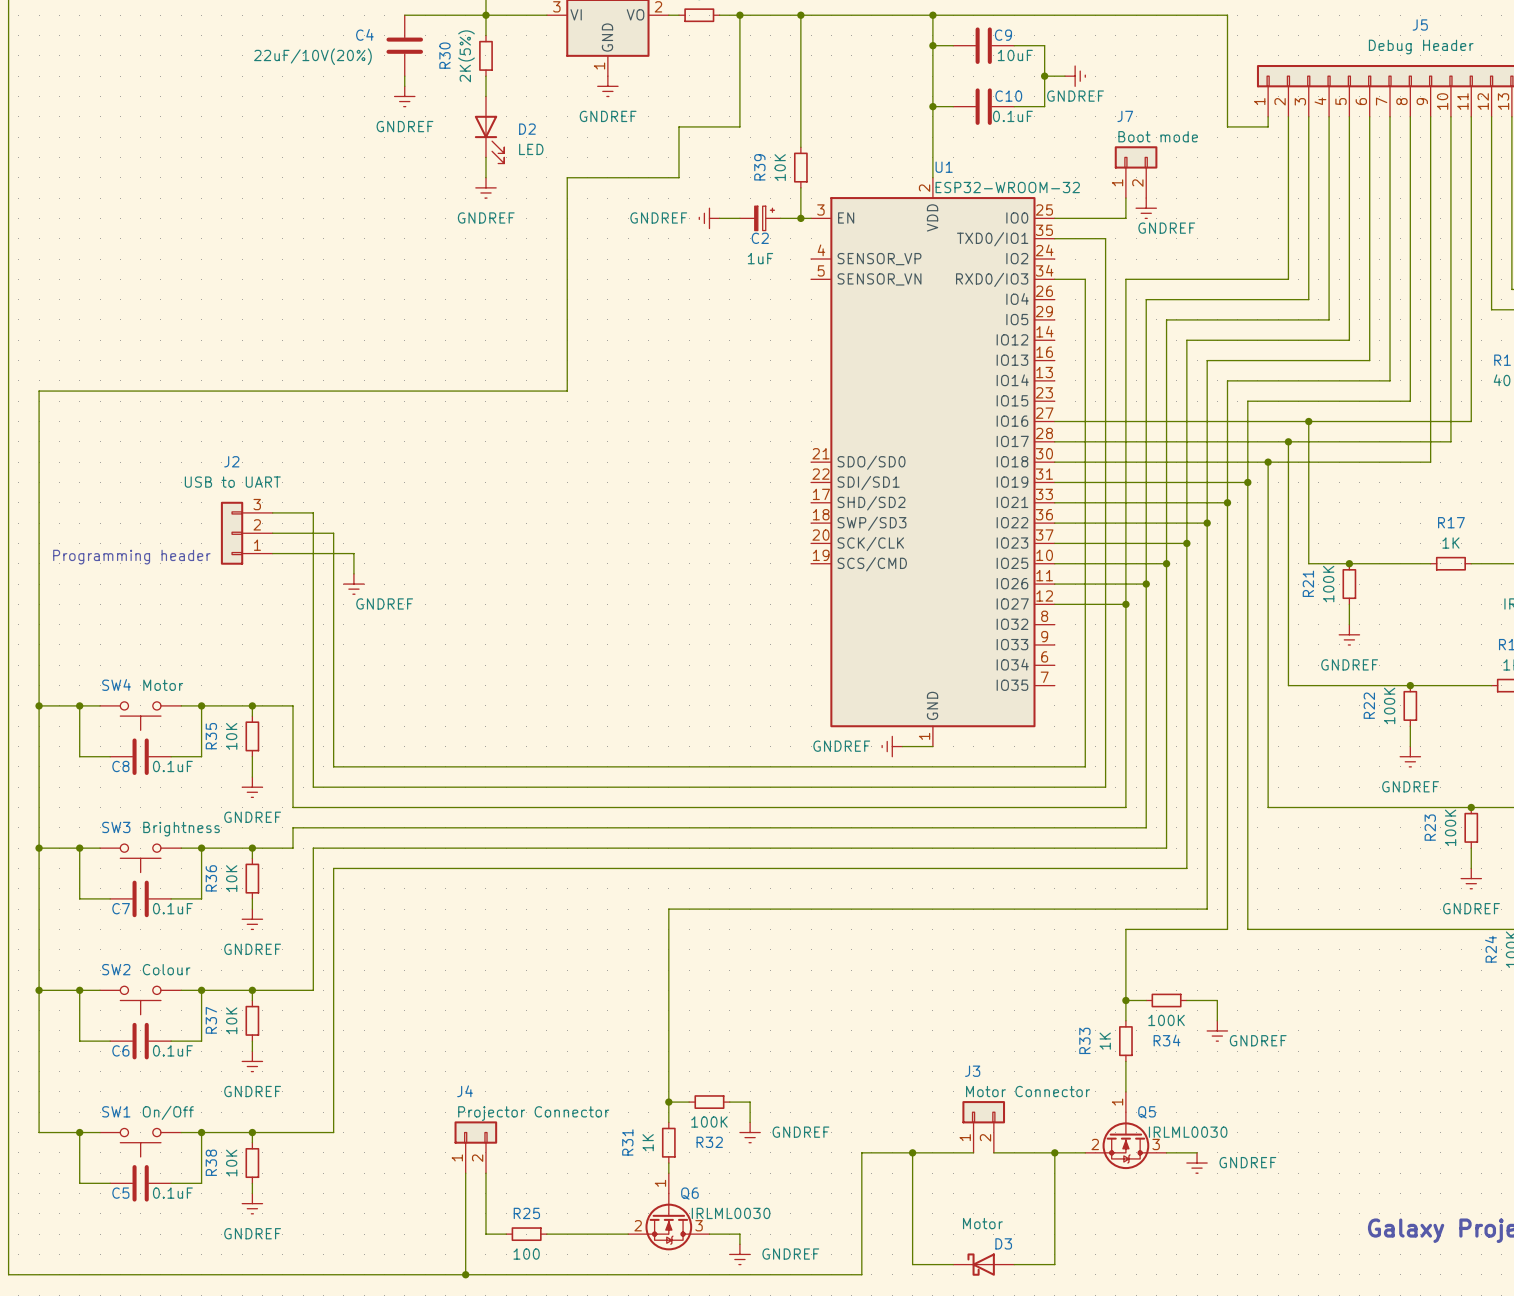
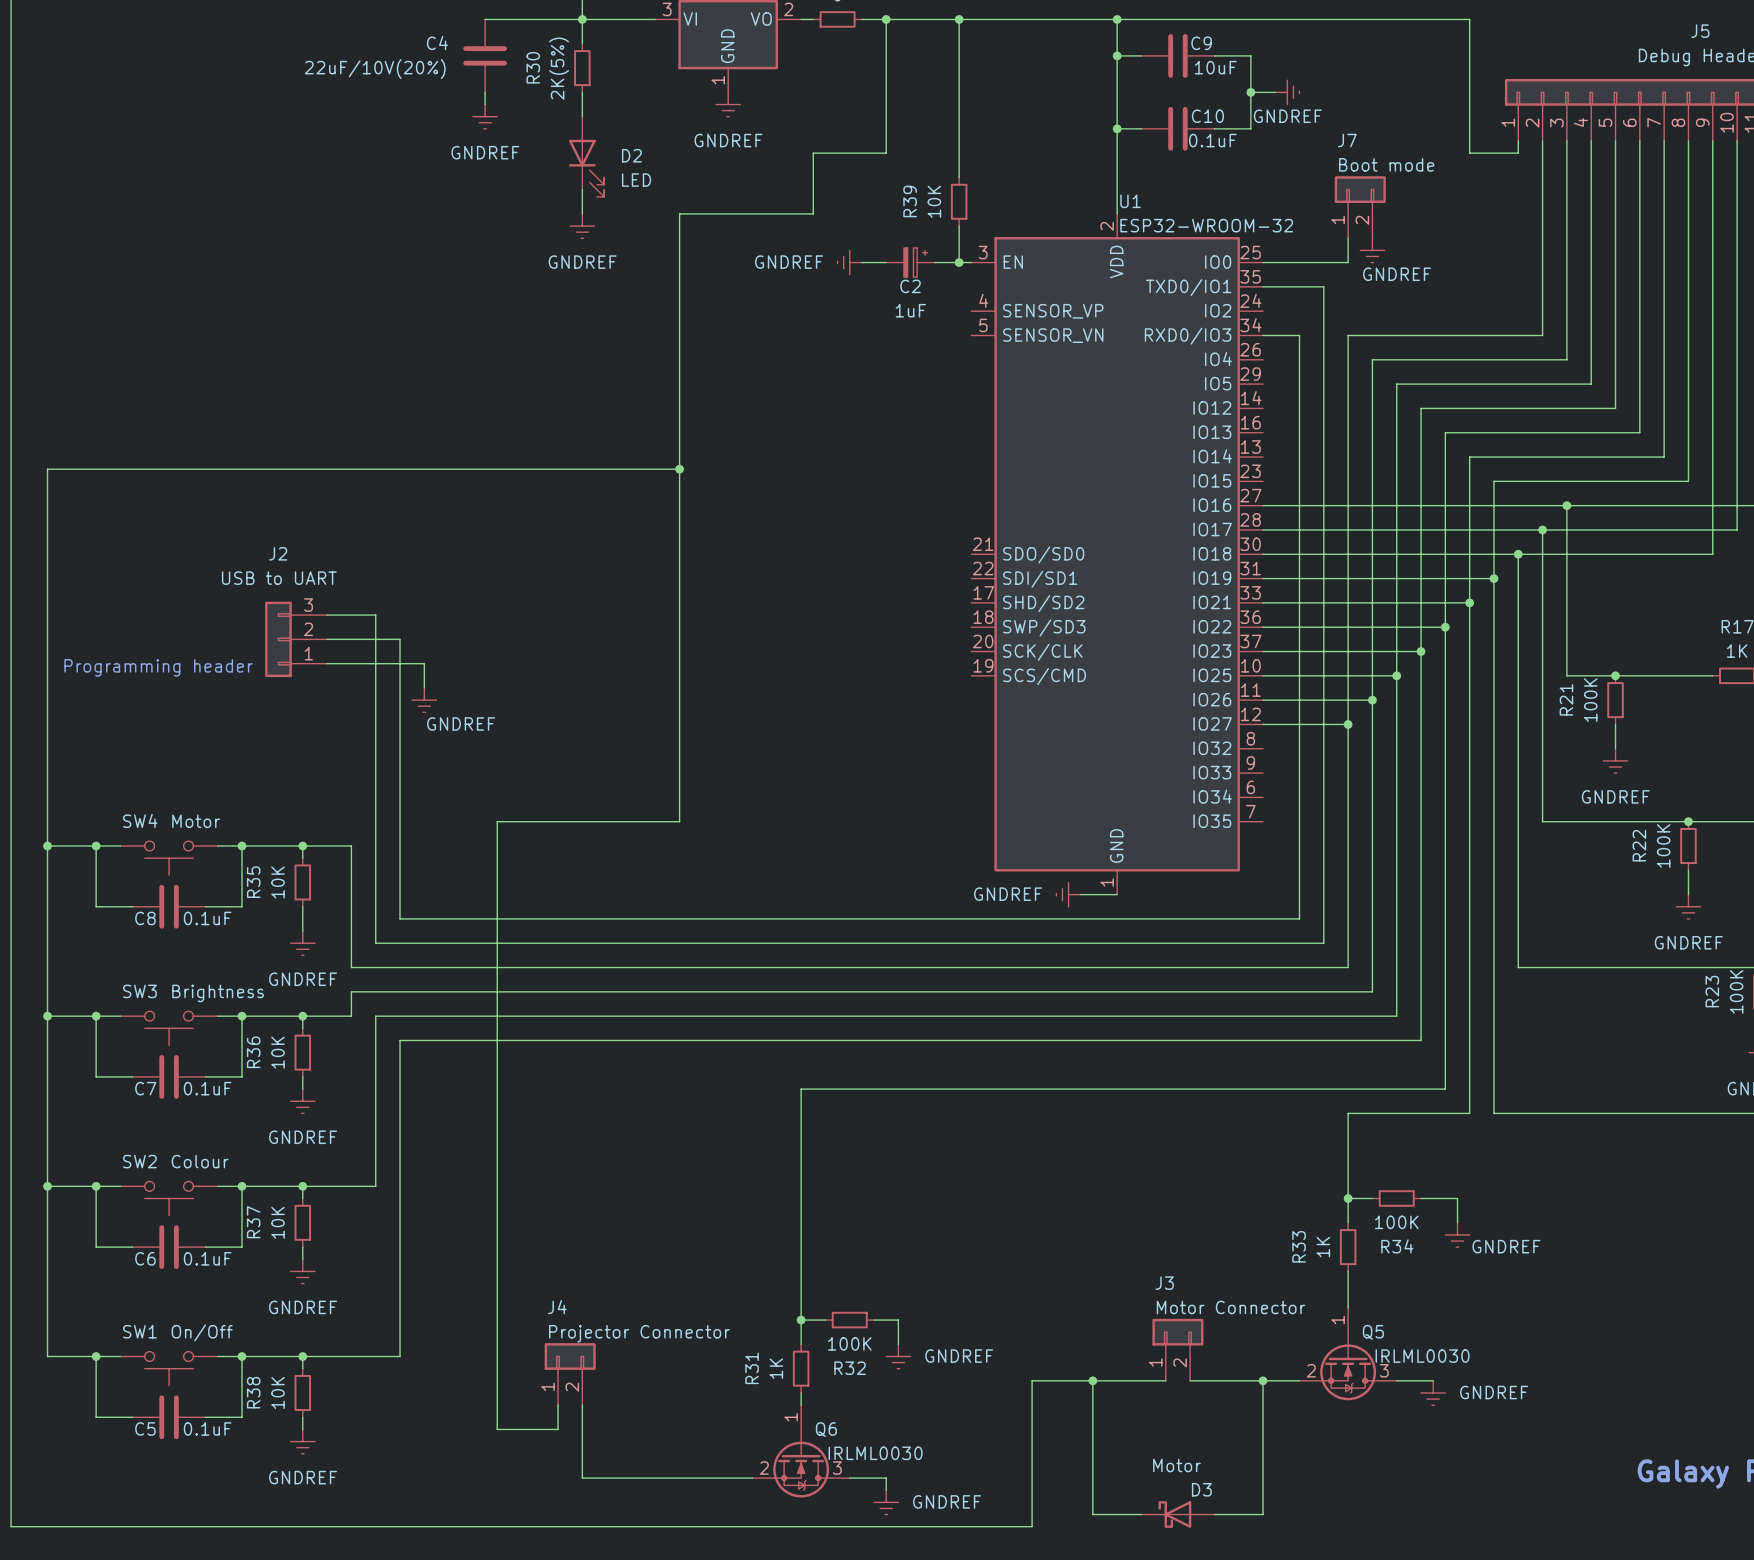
junction: none -> (679, 469)
wire: (465, 1193) (465, 1274) -> (558, 1429) (497, 1429) (497, 821) (679, 821) (679, 469)
wire: none -> (606, 1478) (655, 1478)
R25: 100 (526, 1234) -> none
junction: (465, 1274) -> none

